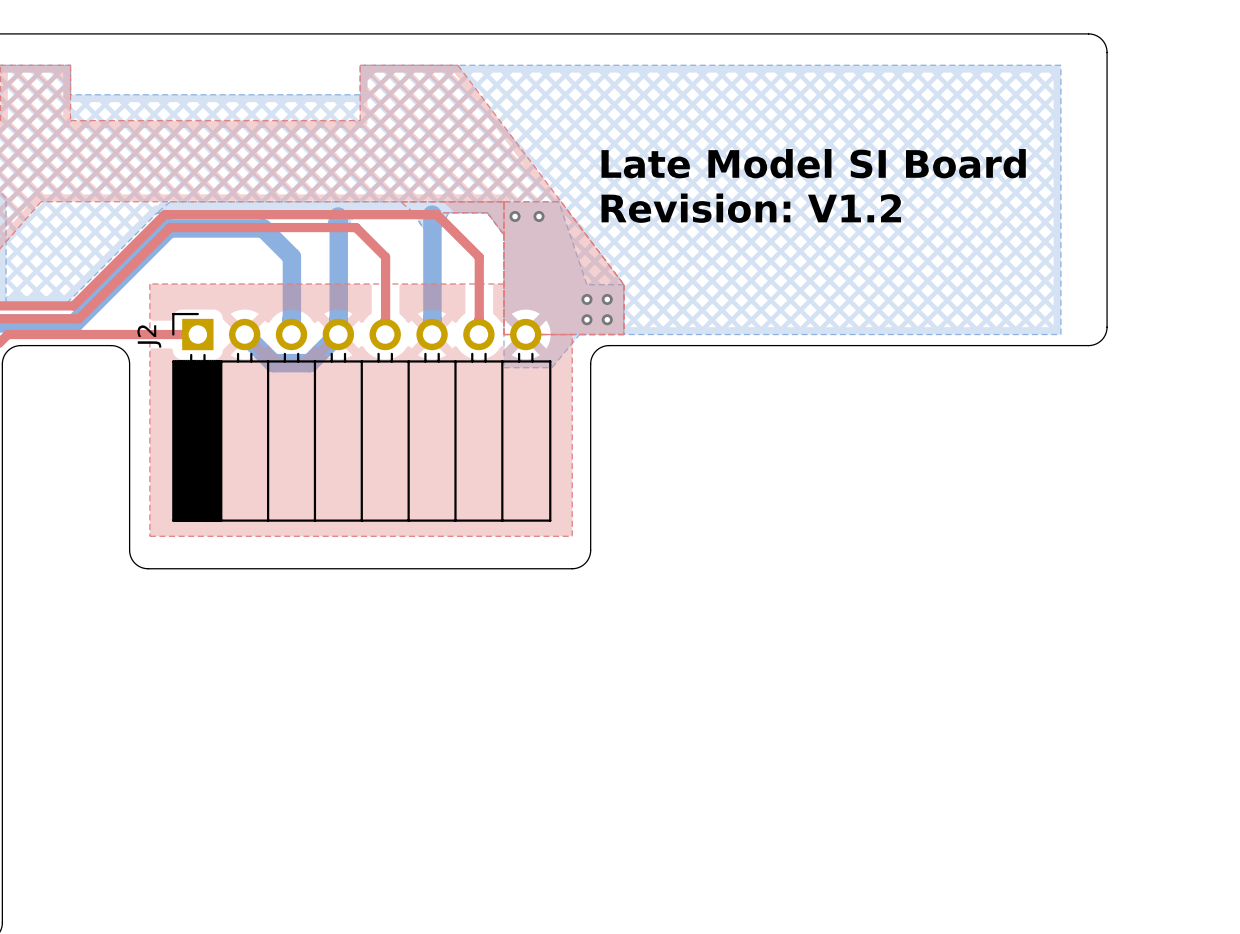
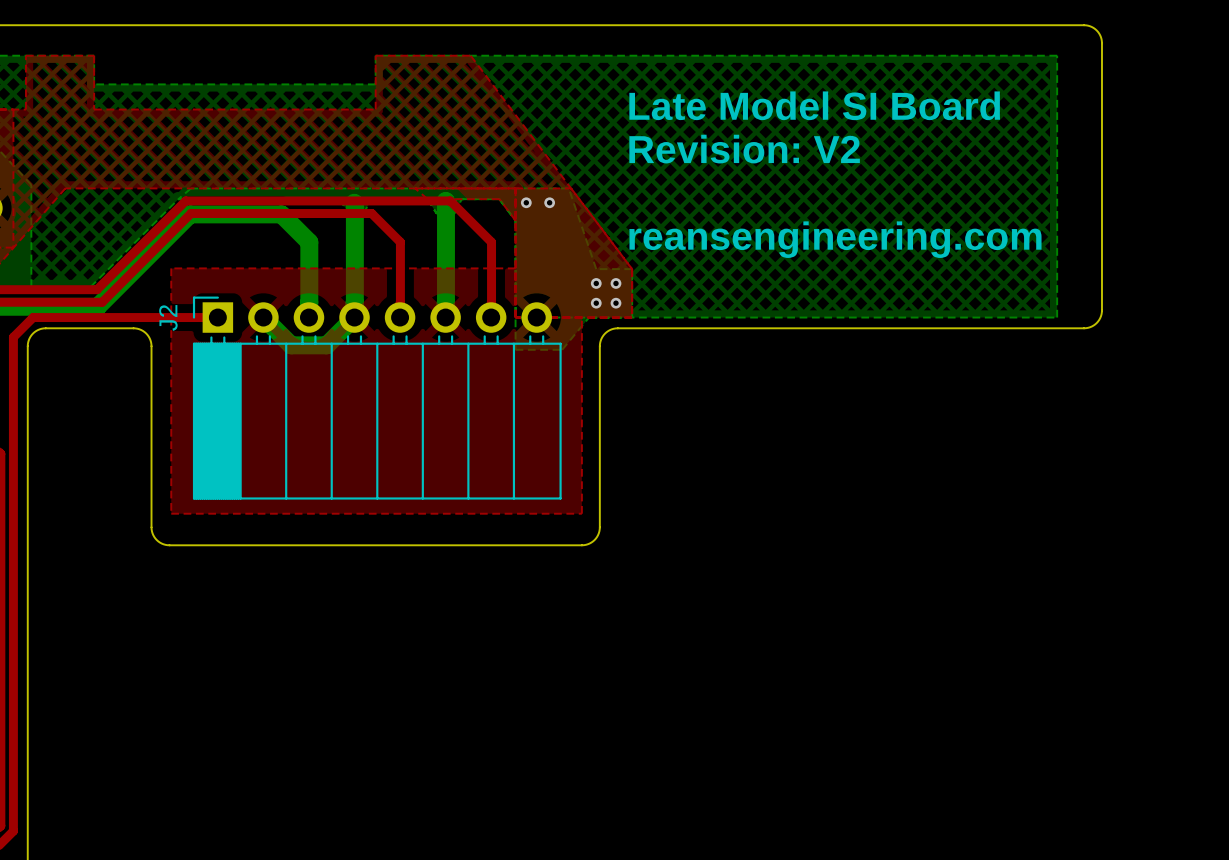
text position: Late Model SI Board (813, 163) -> Late Model SI Board (814, 105)
text: Revision: V1.2 (751, 208) -> Revision: V2 (744, 149)
text: none -> reansengineering.com (835, 239)

